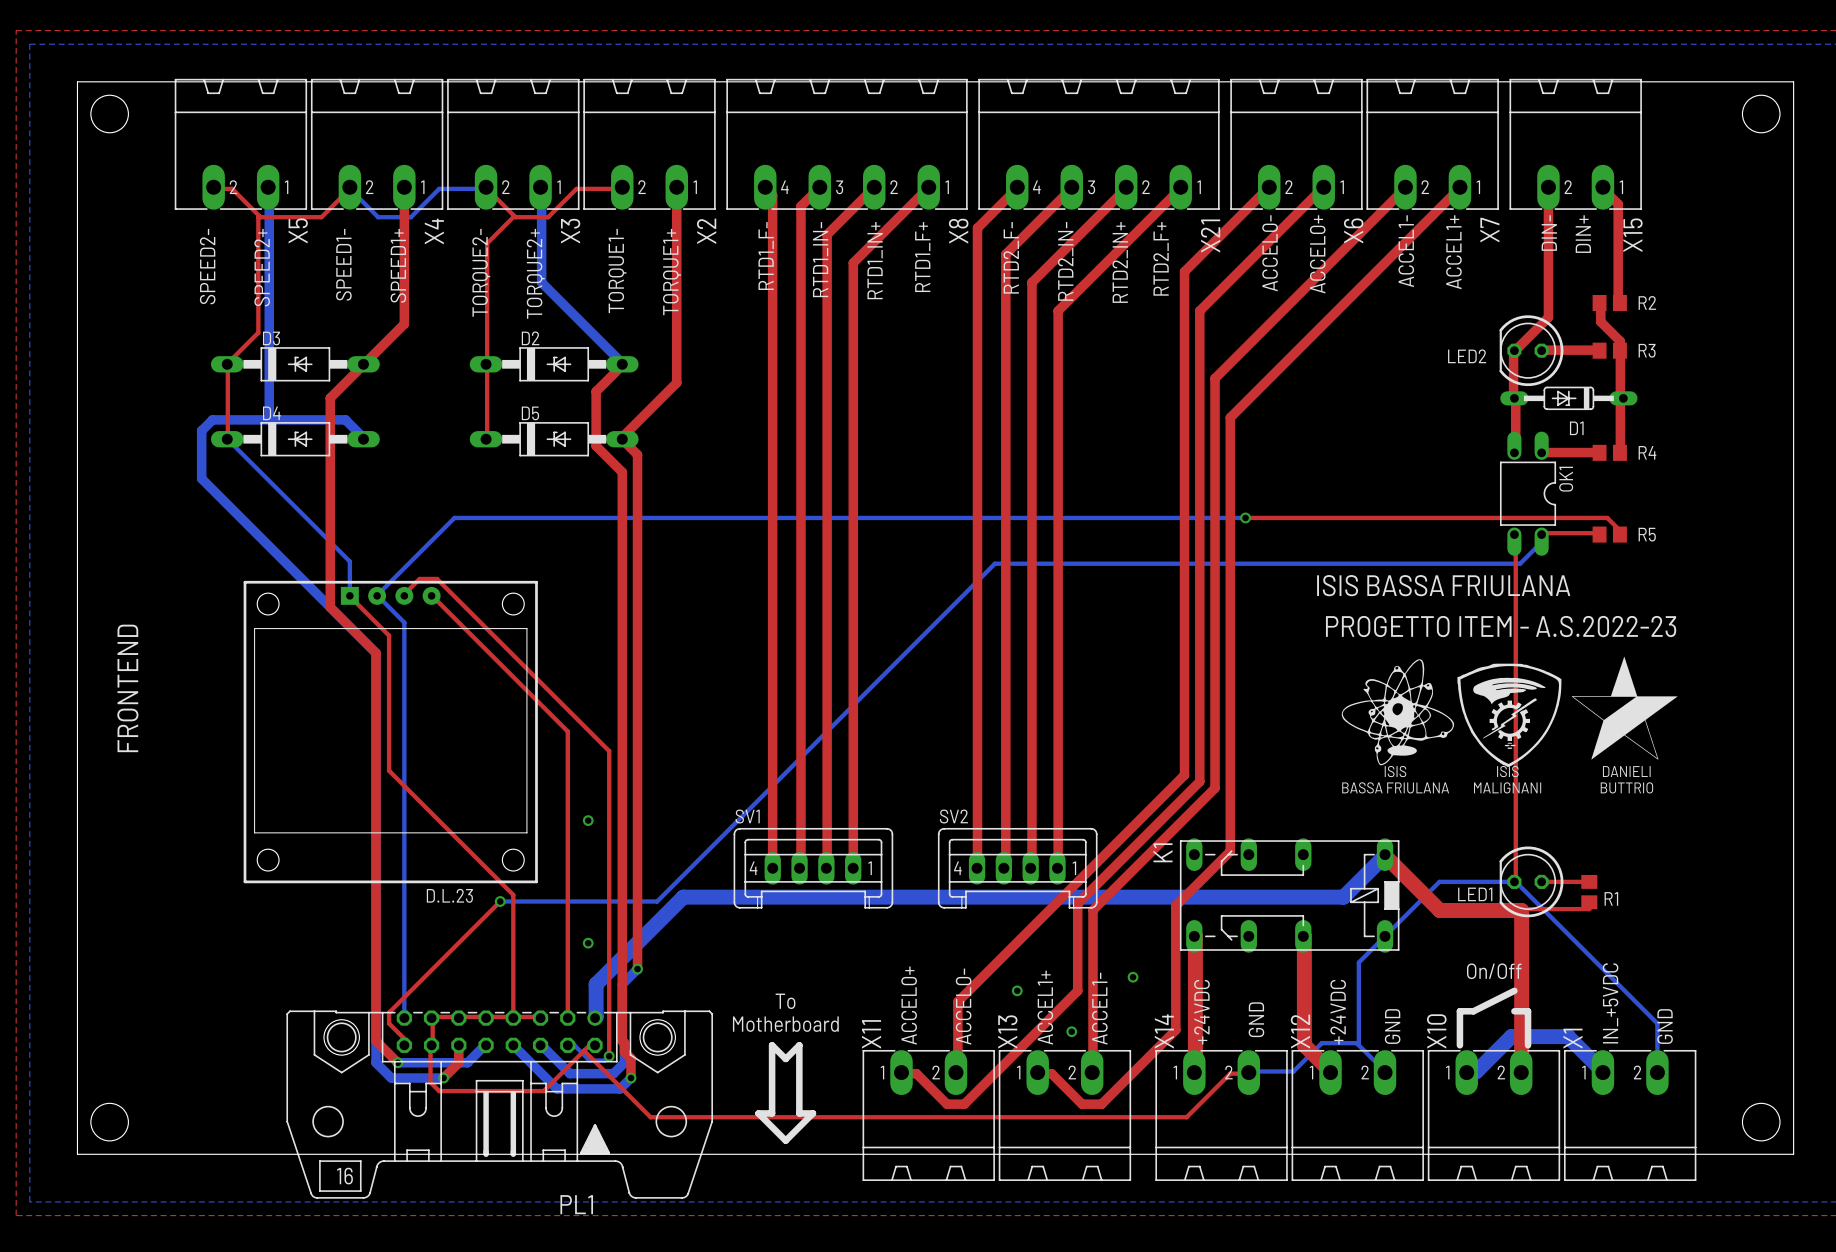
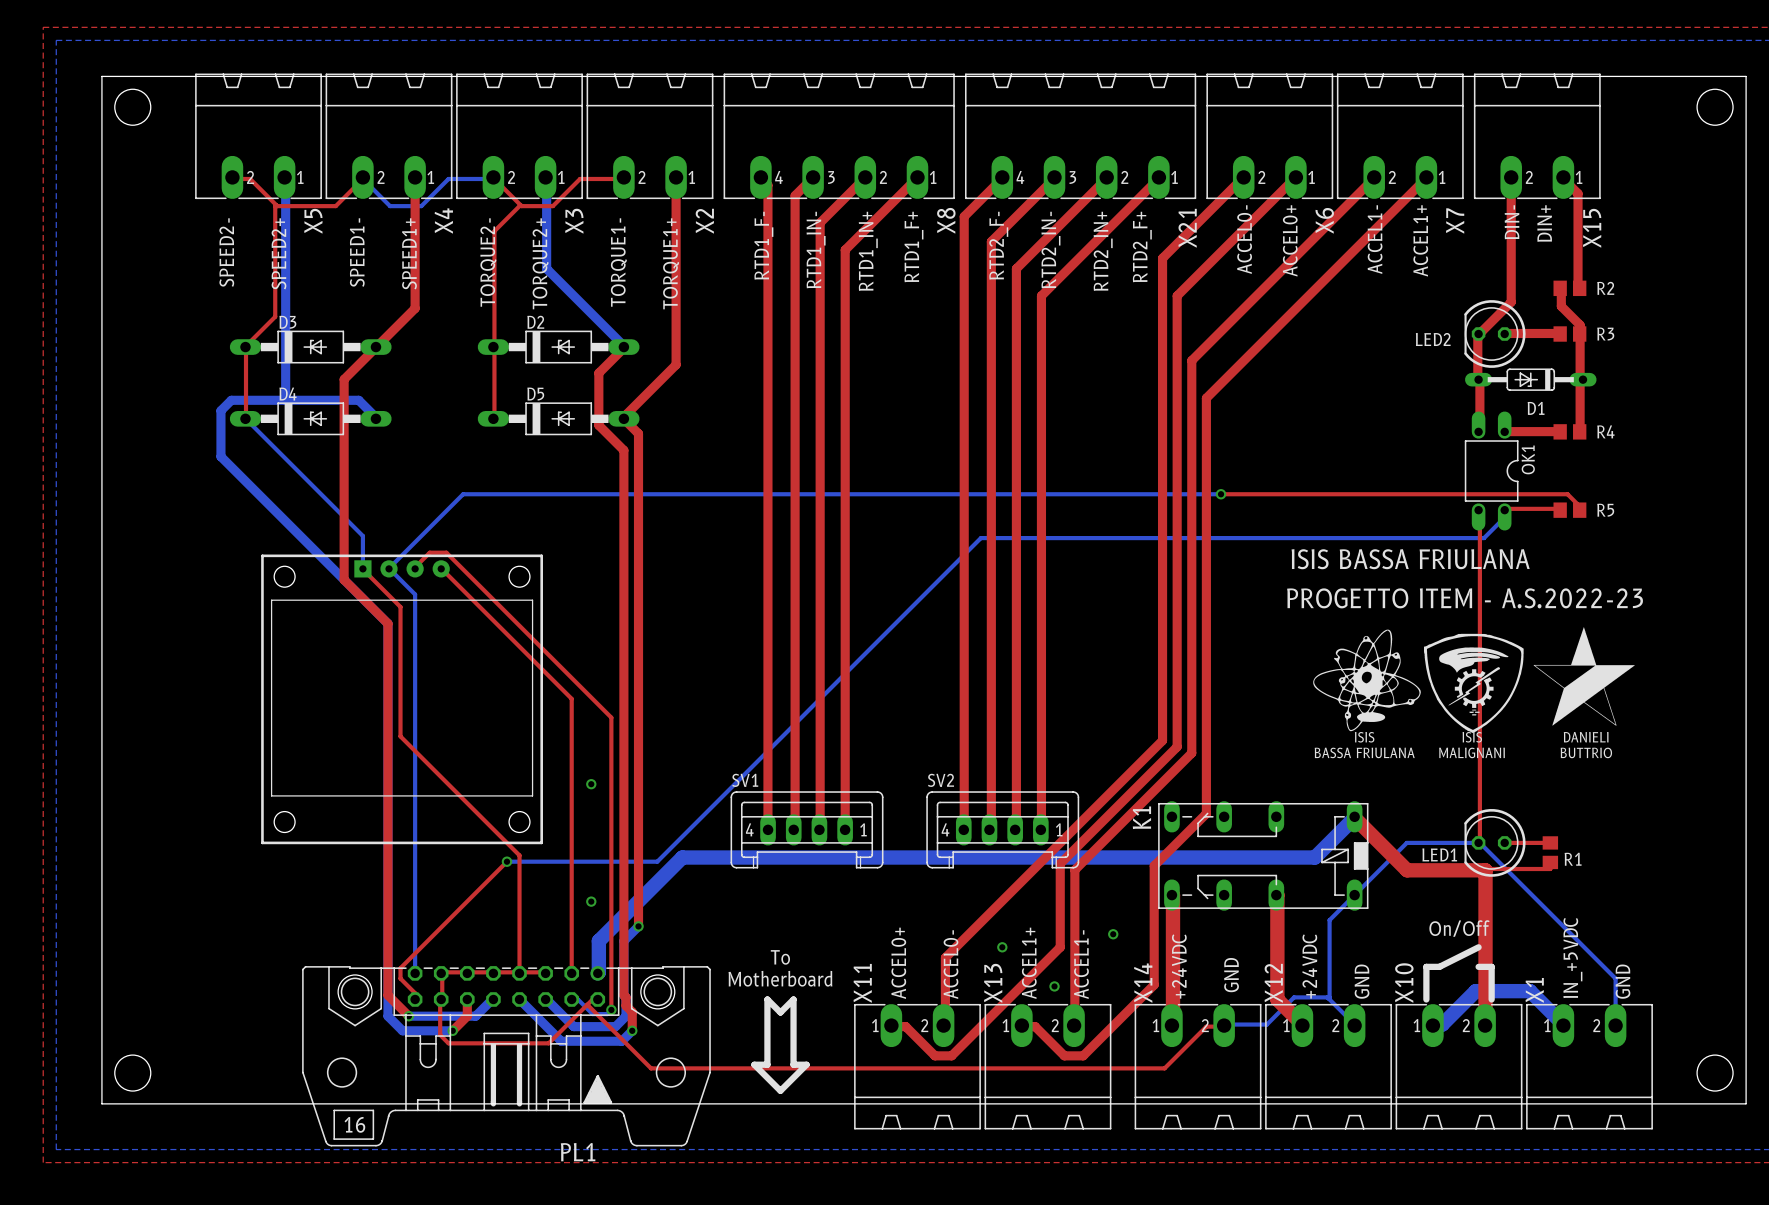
text: FRONTEND (127, 688) -> none
text: D.L.23 (449, 895) -> none

